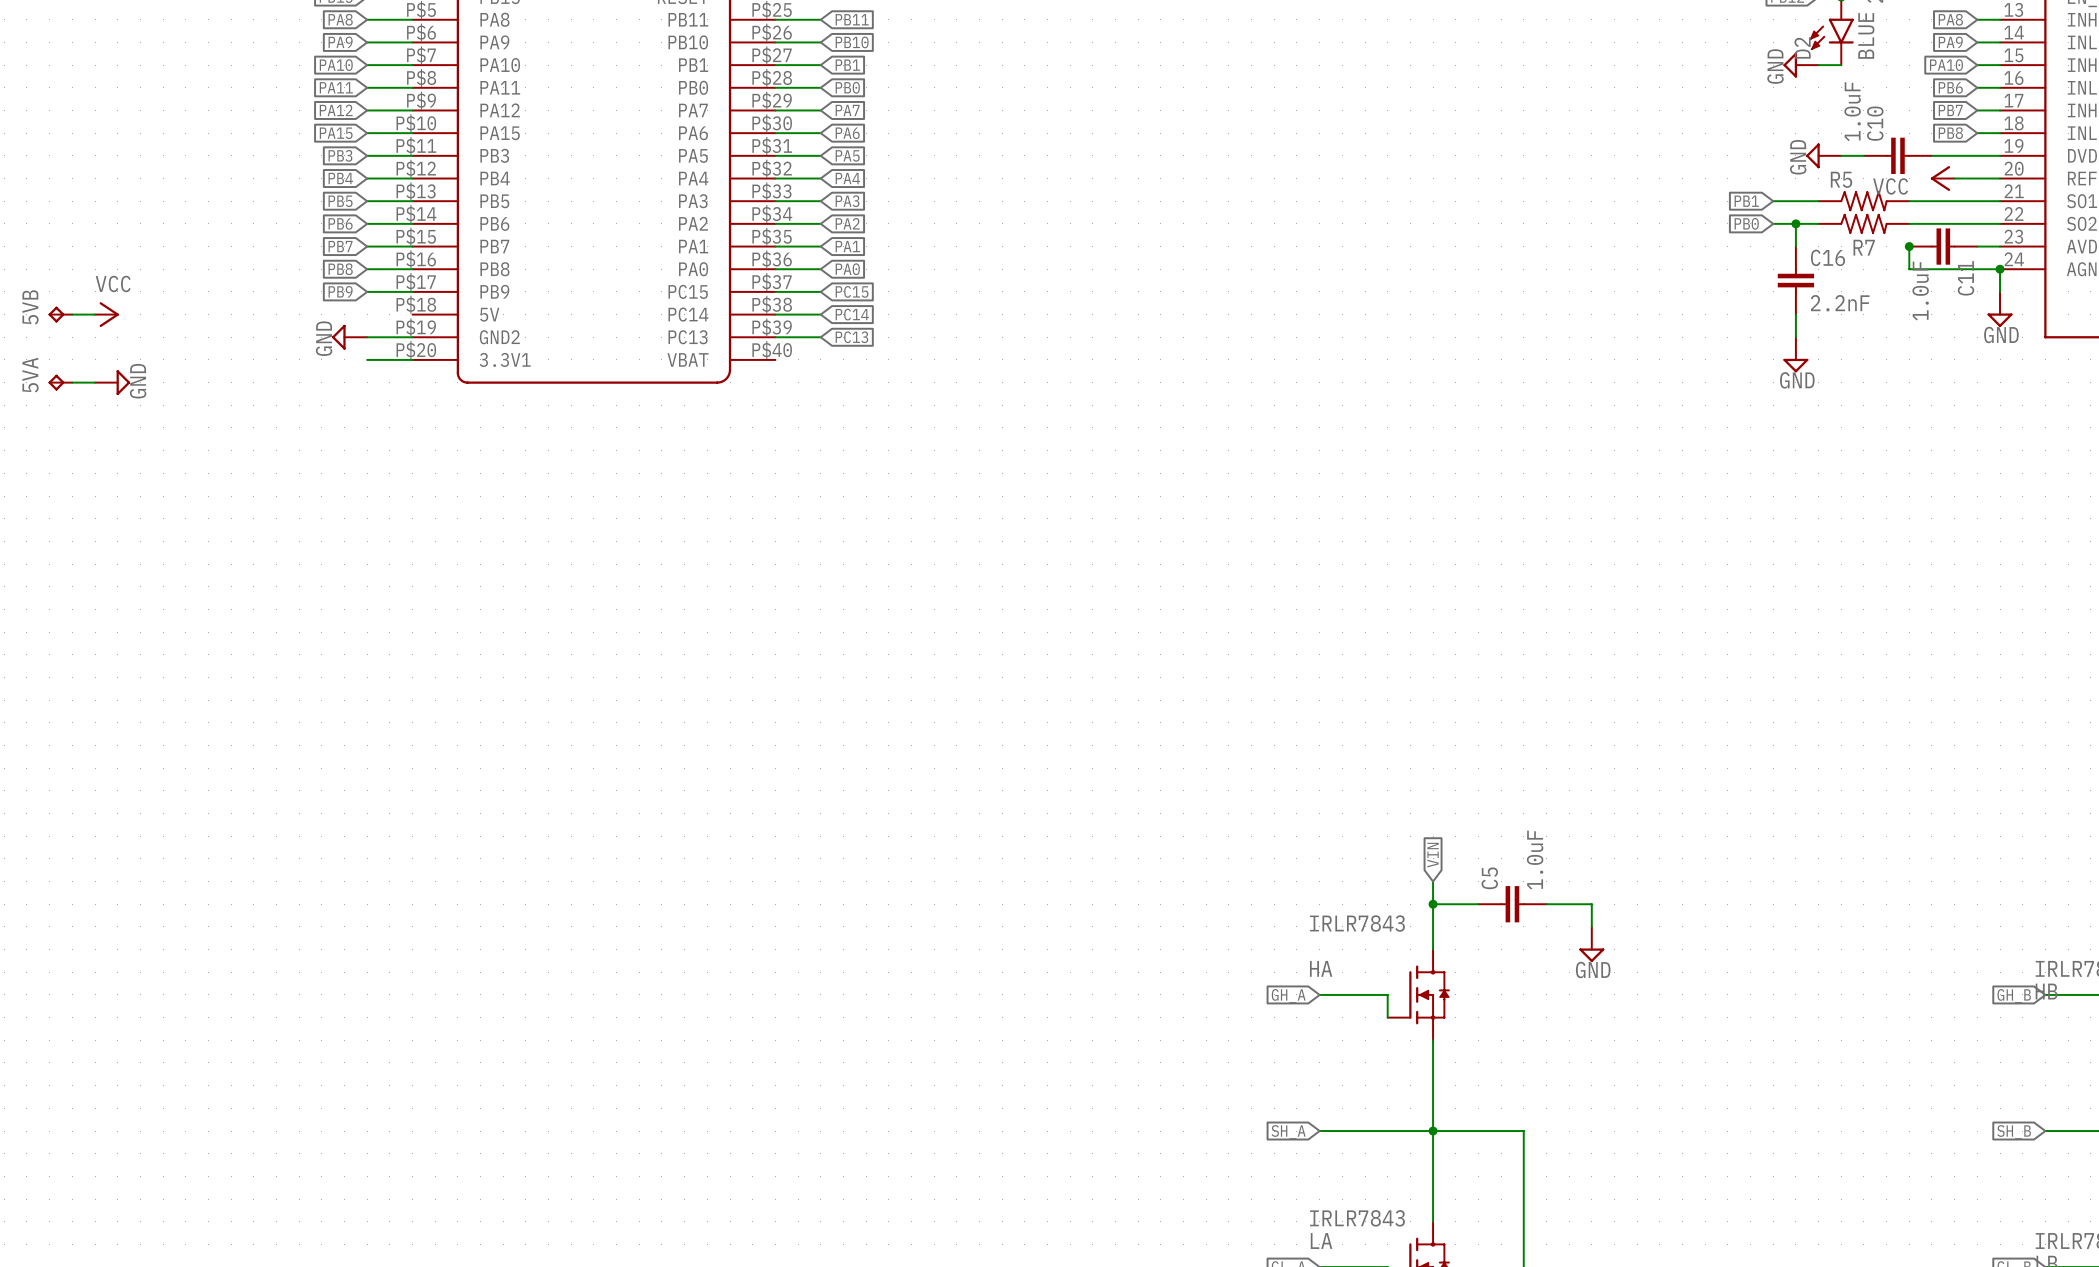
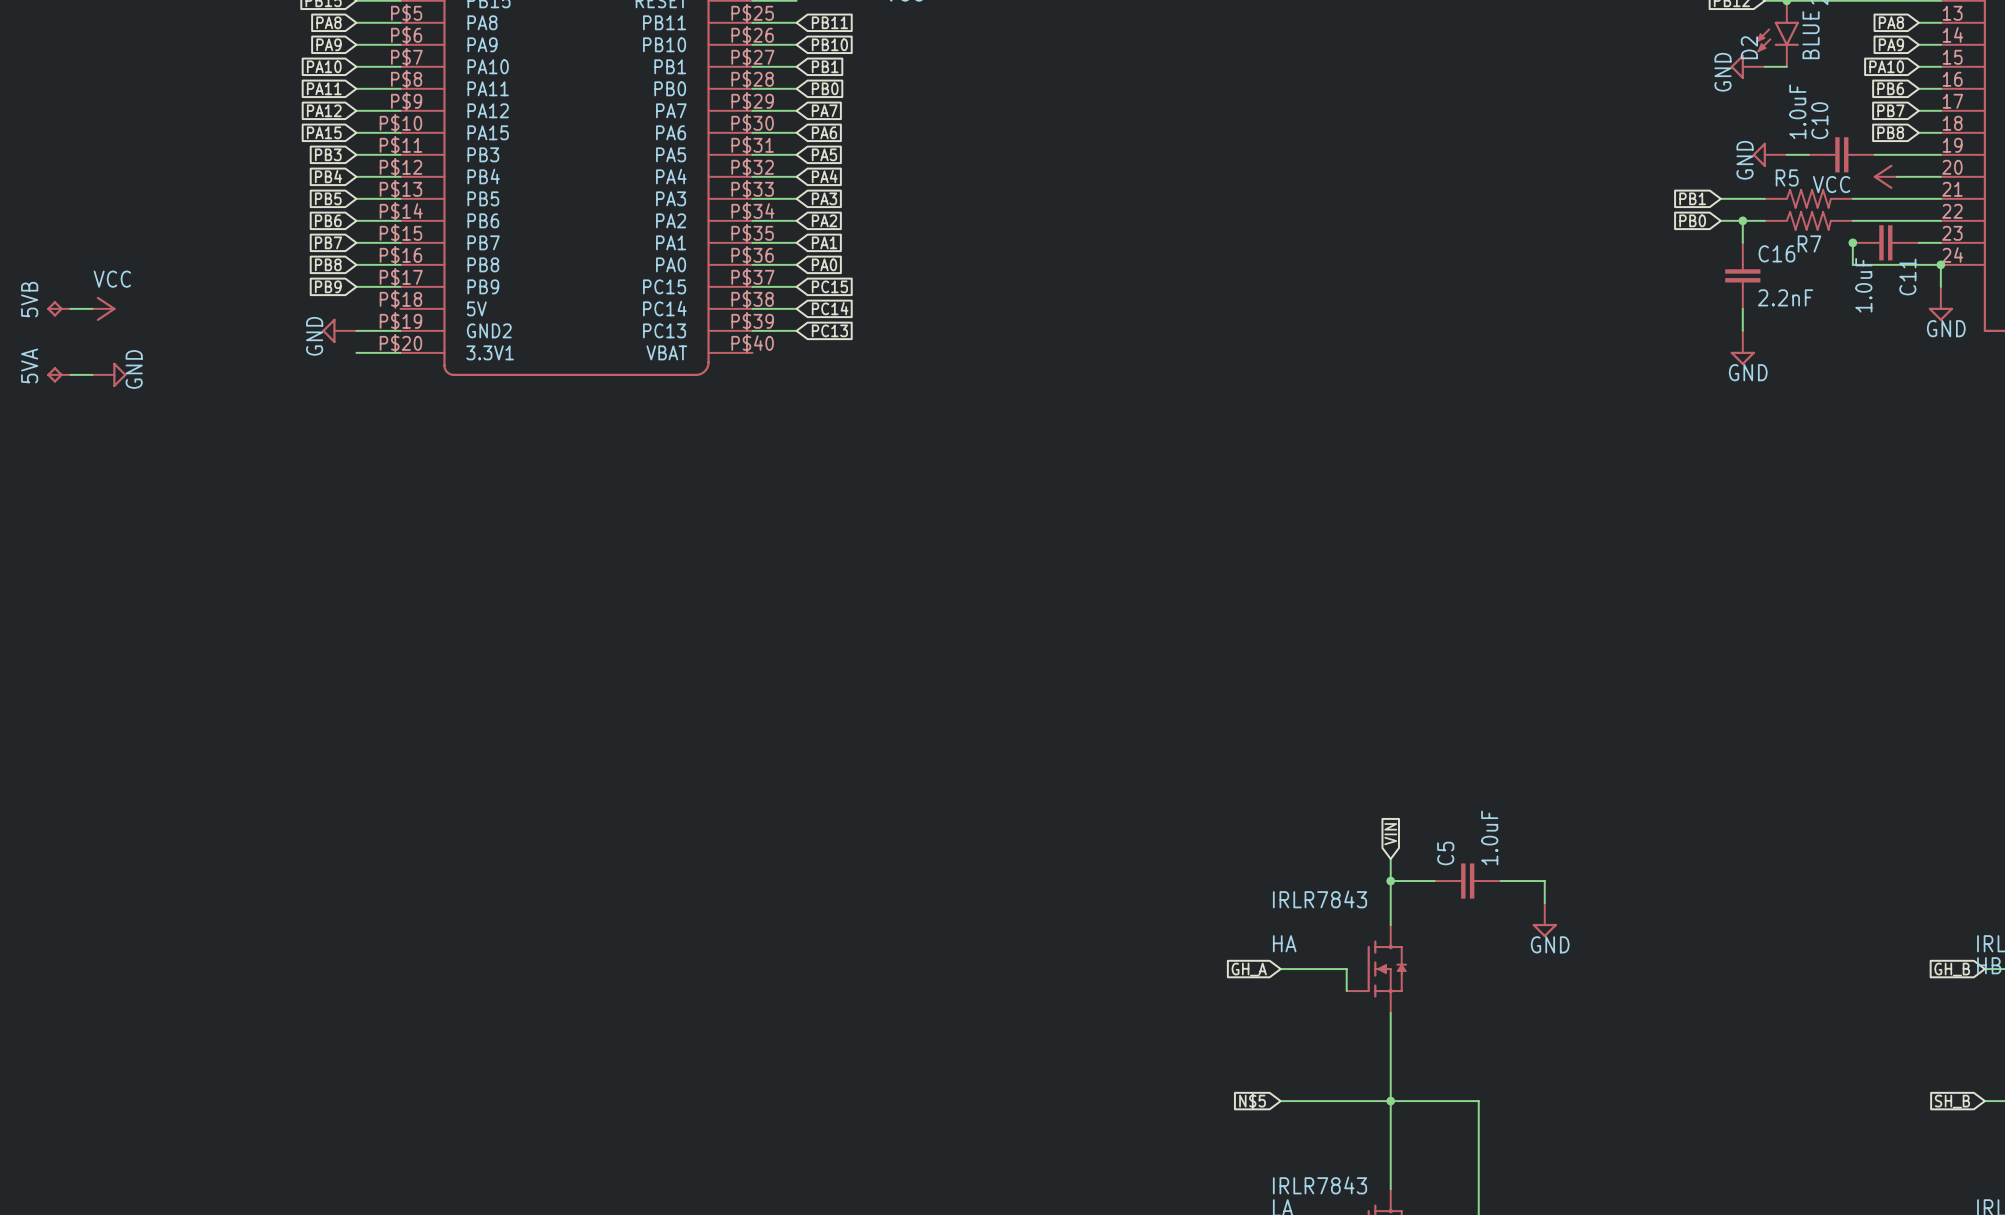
global label: SH_A (1288, 1132) -> N$5 (1252, 1101)

